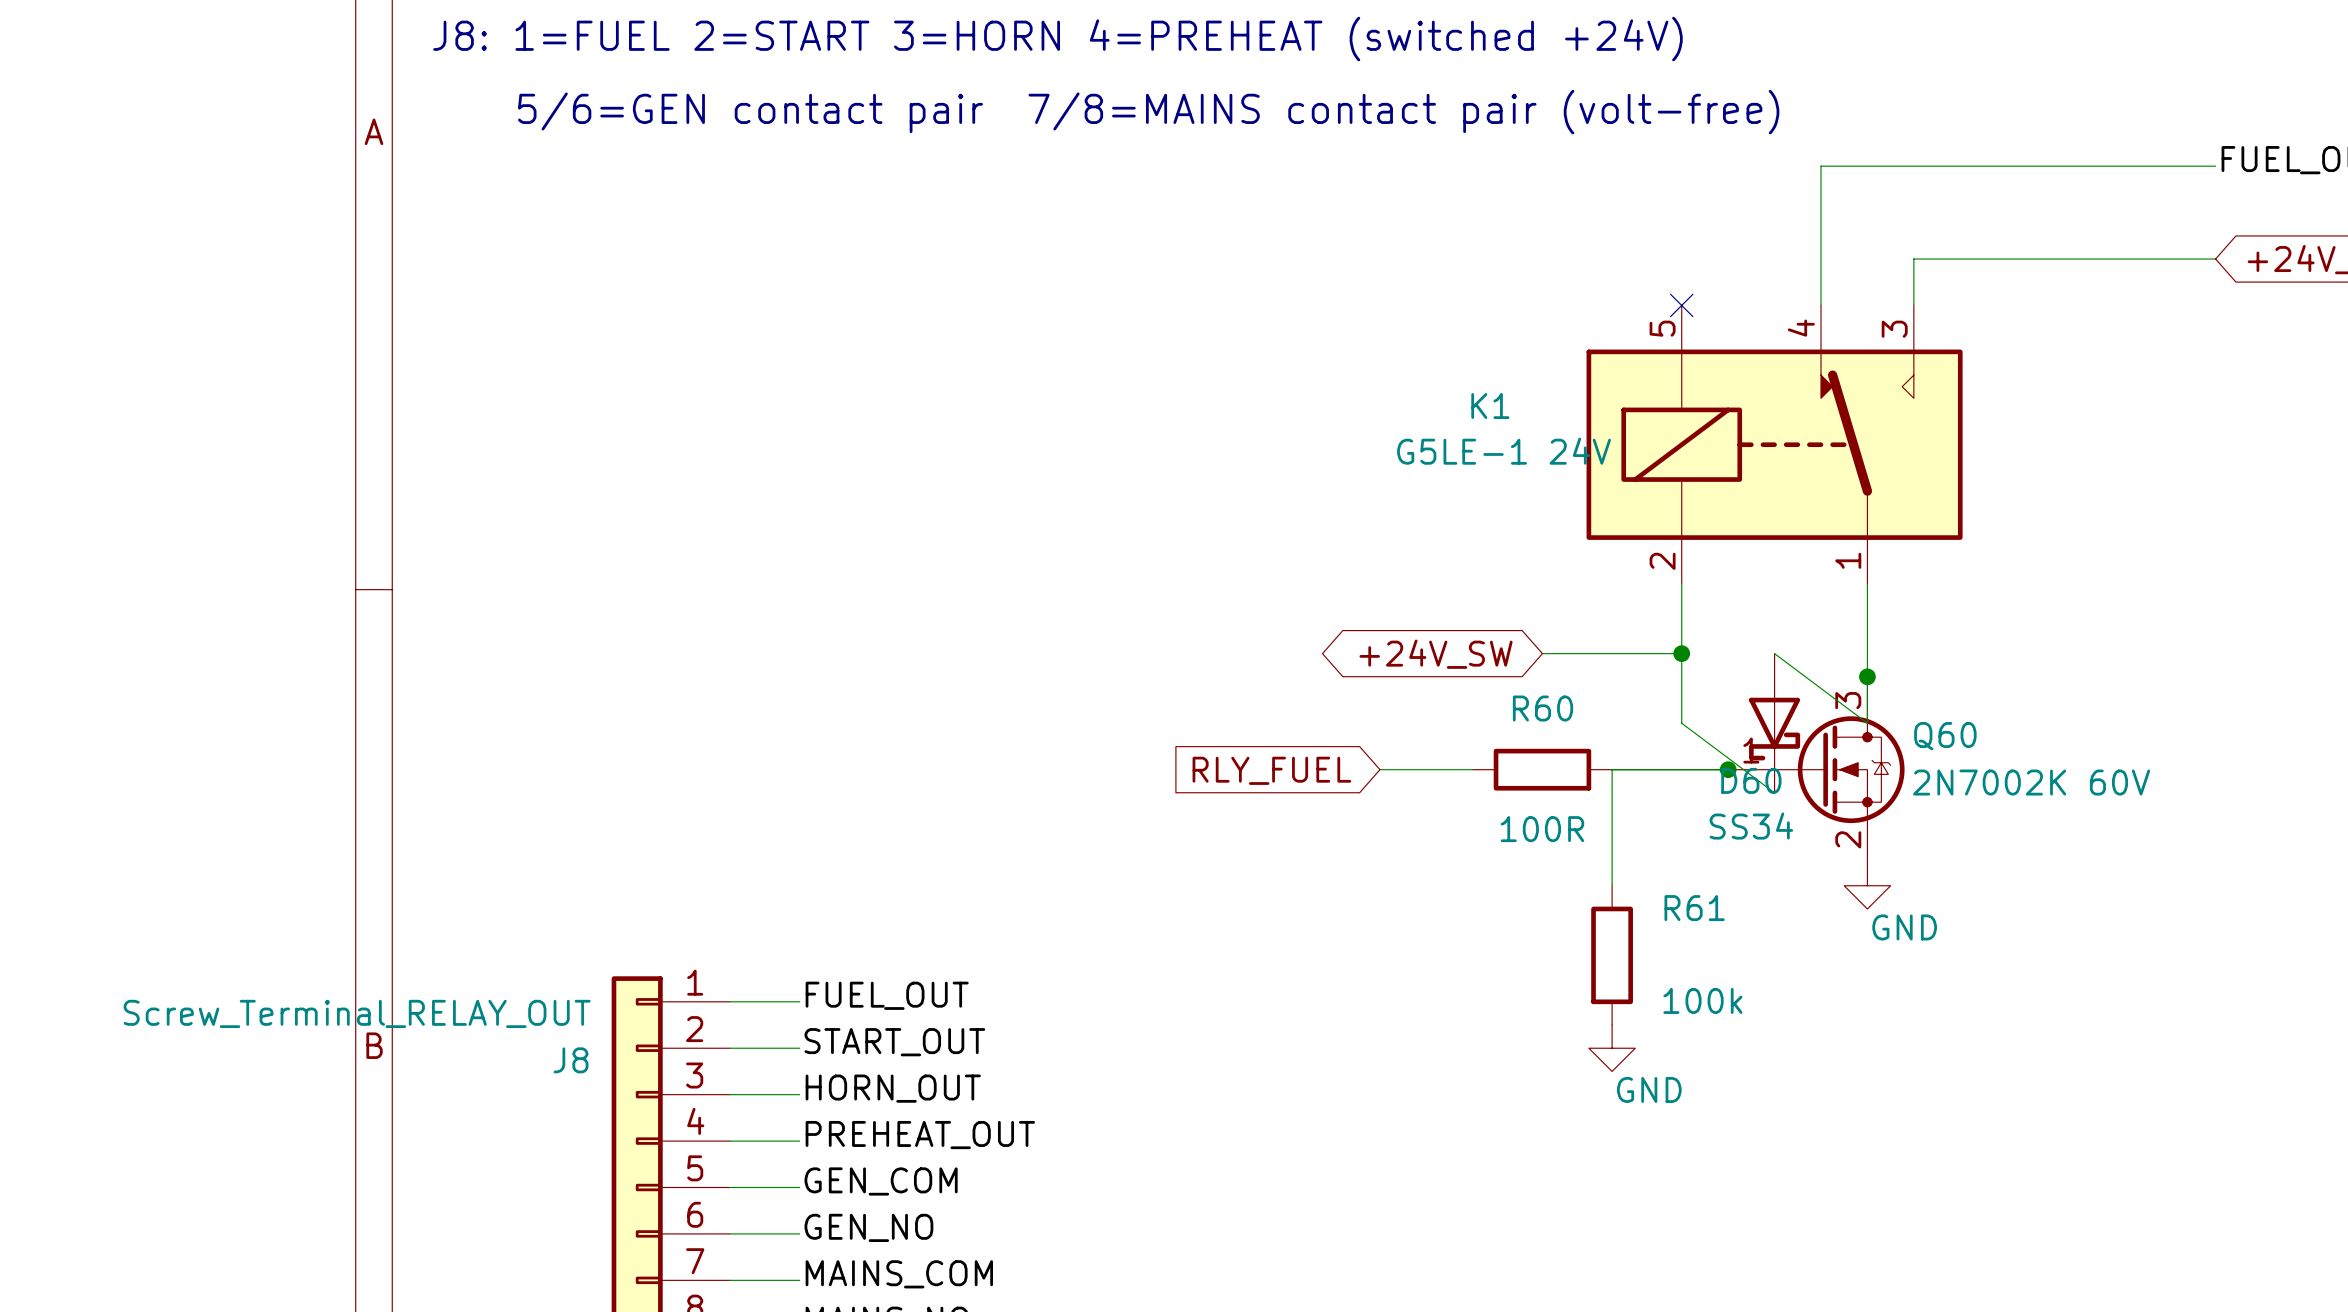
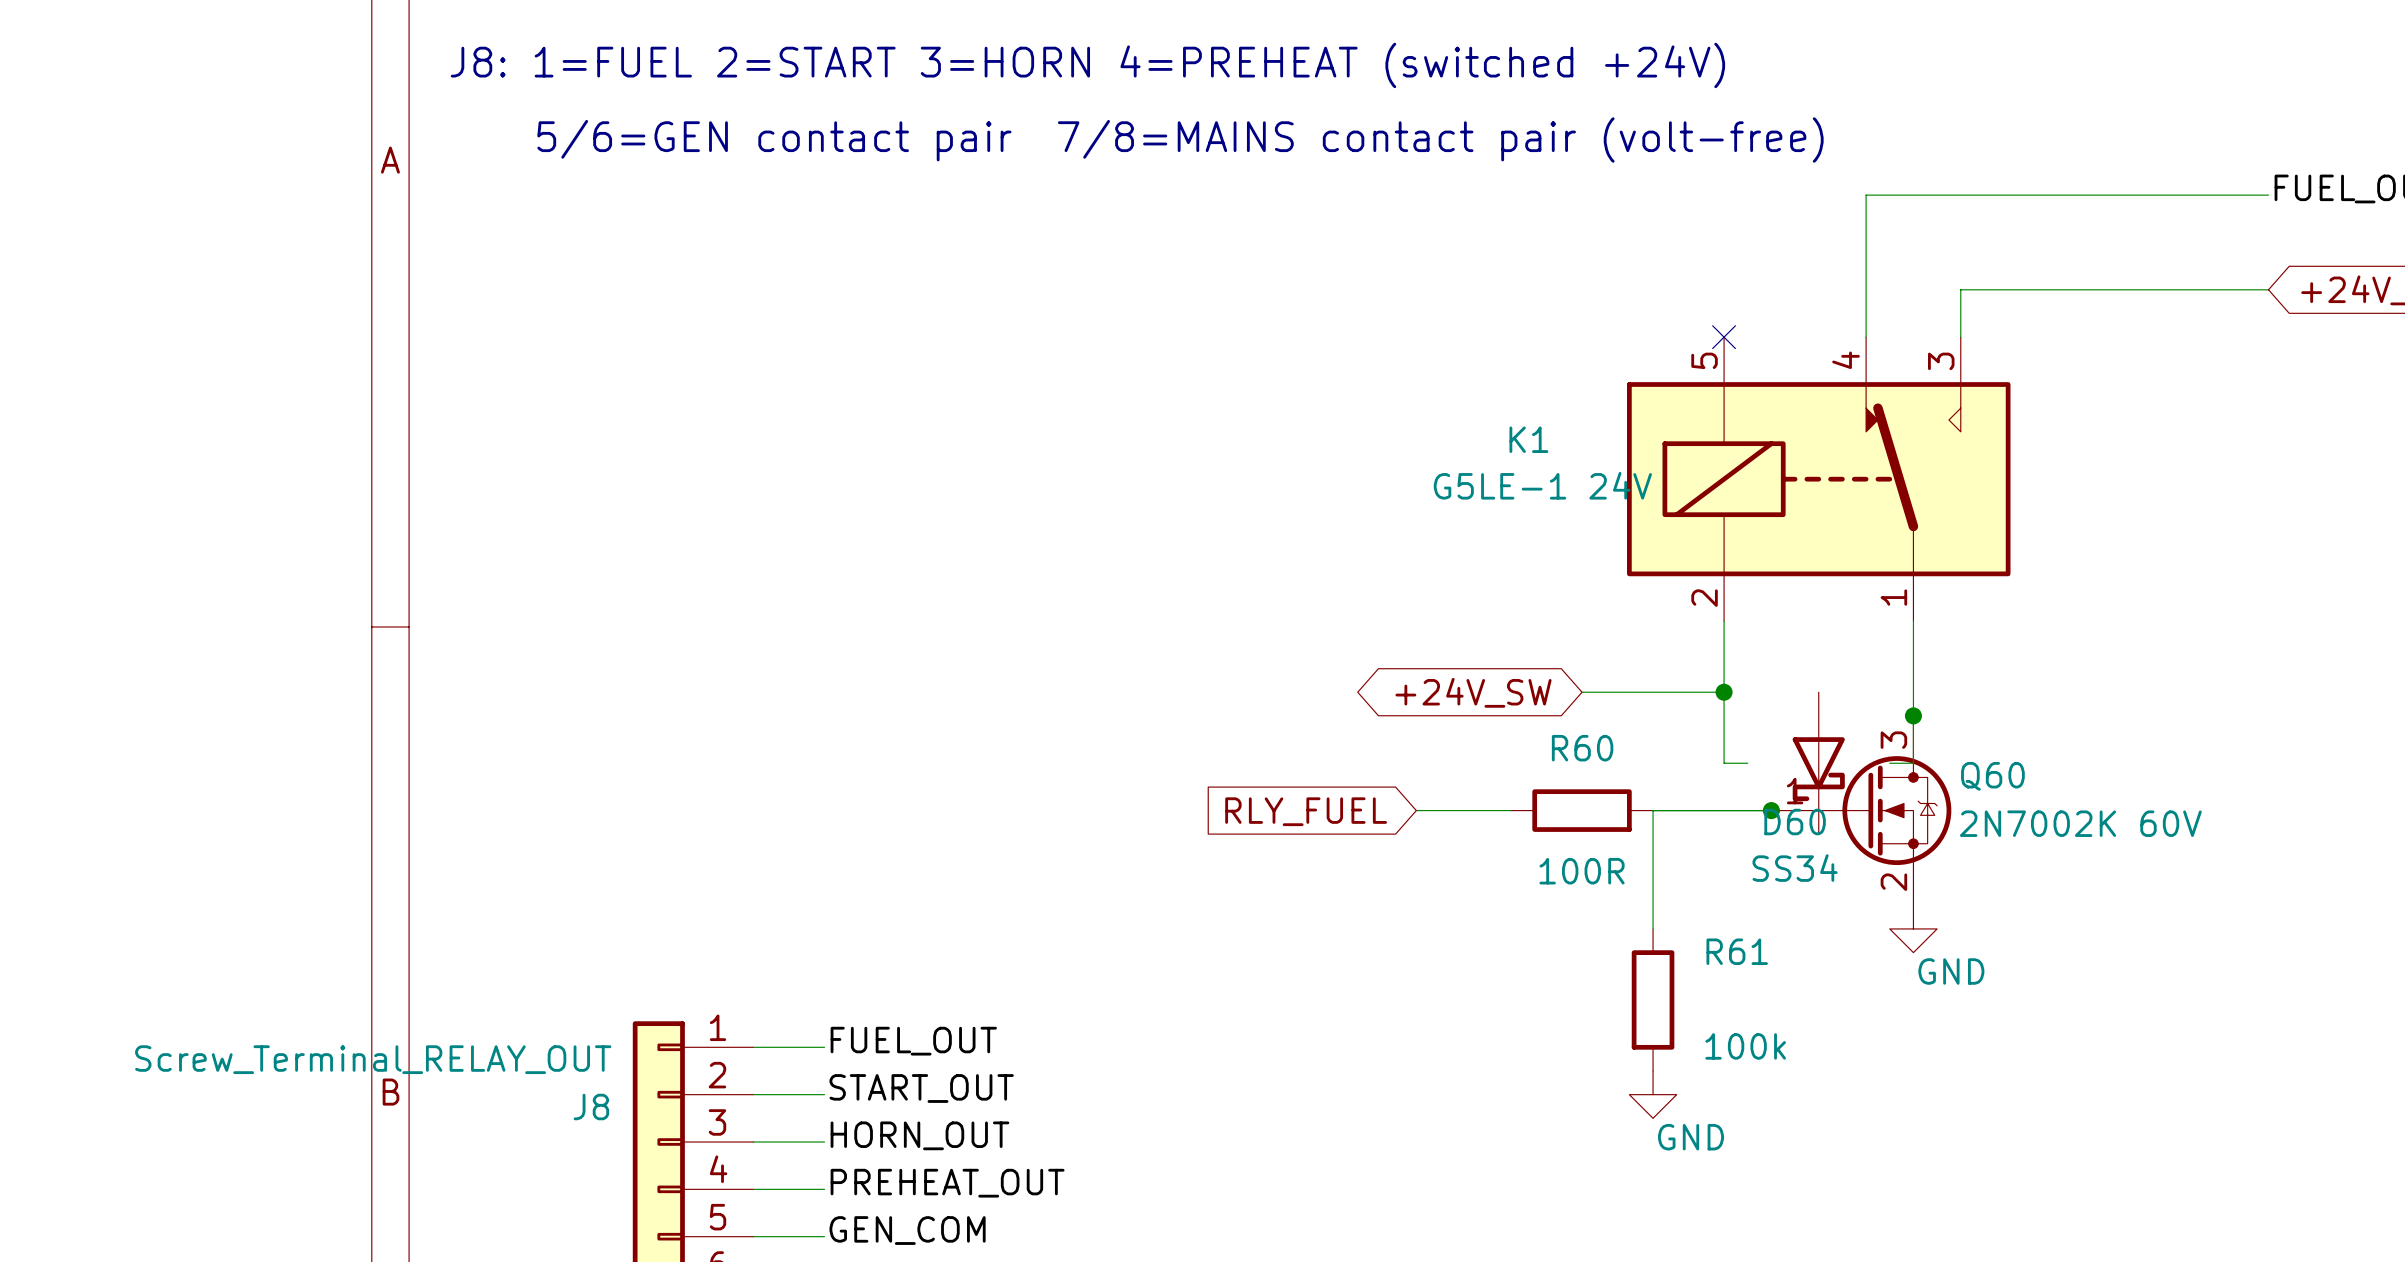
wire: (1774, 653) (1867, 723) -> (1889, 763) (1913, 763)
wire: (1681, 723) (1774, 792) -> (1724, 763) (1747, 763)

